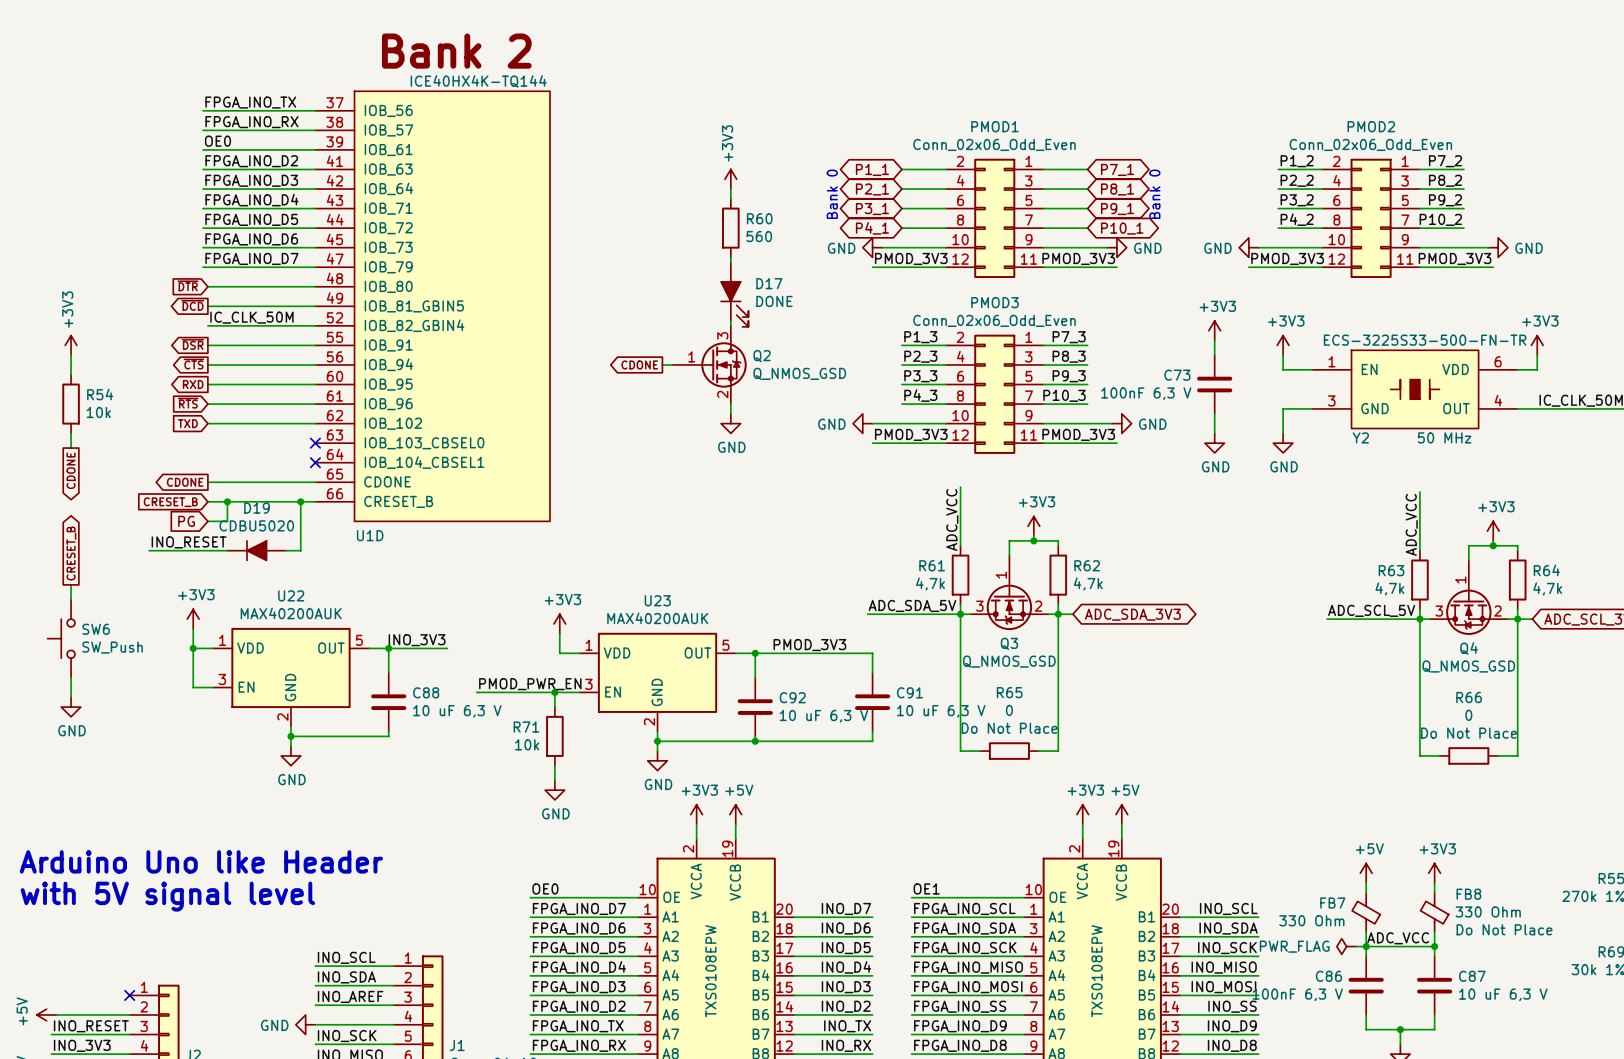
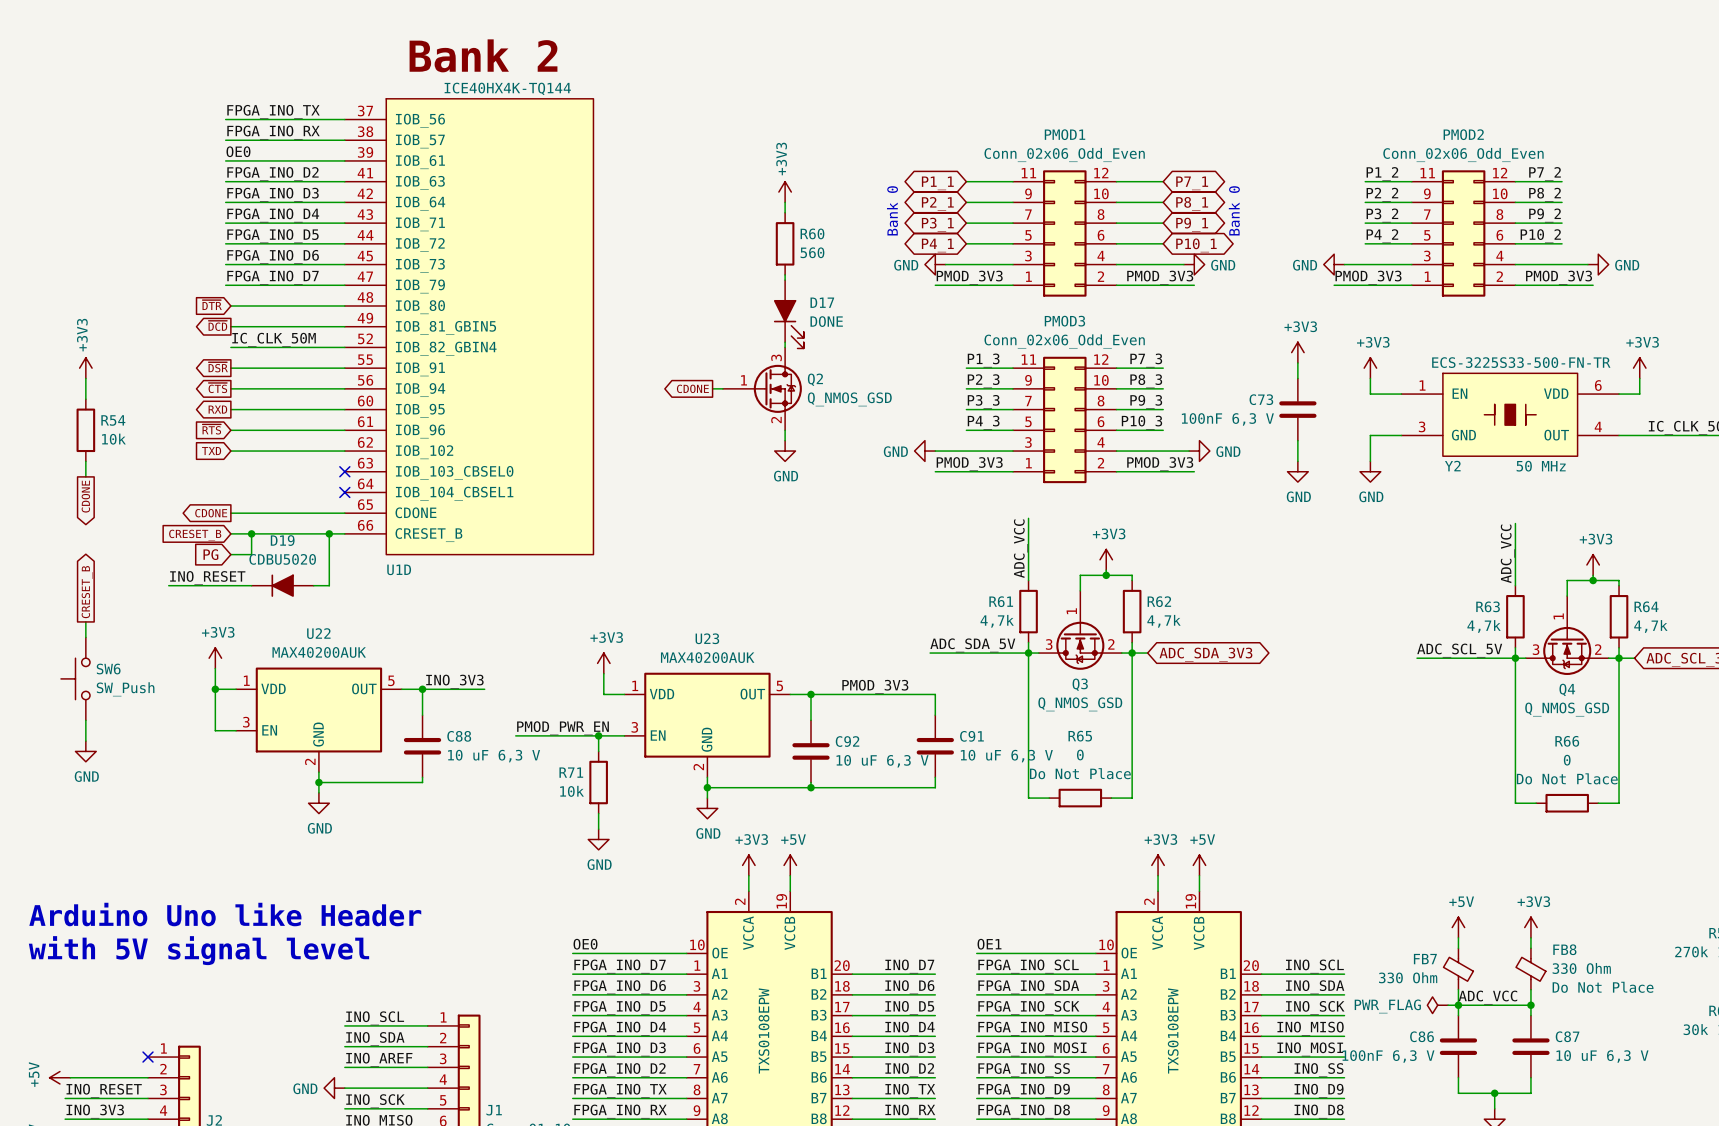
PMOD1 rotation: 0° (994, 218) -> 180° (1064, 233)
PMOD2 rotation: 0° (1371, 218) -> 180° (1463, 233)
PMOD3 rotation: 0° (994, 394) -> 180° (1064, 419)

